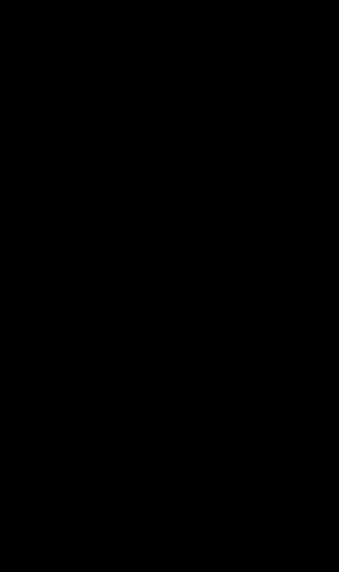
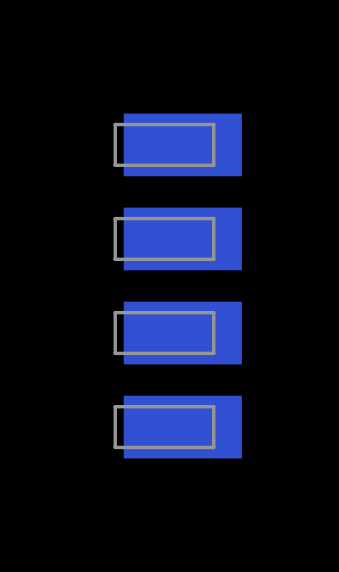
part: none -> (177, 285)

